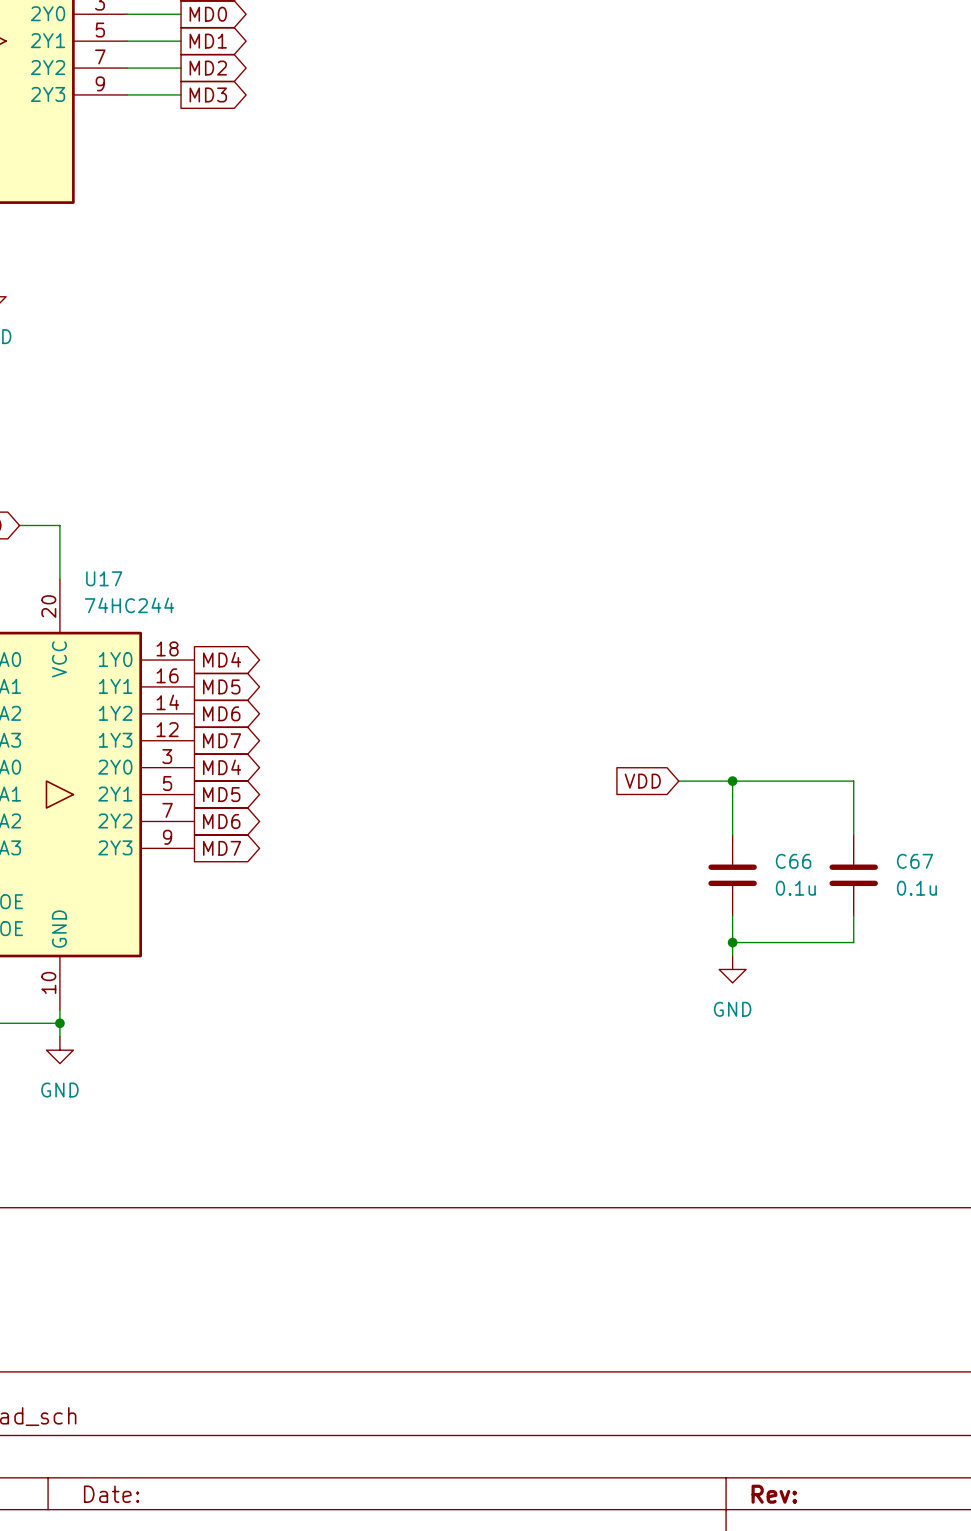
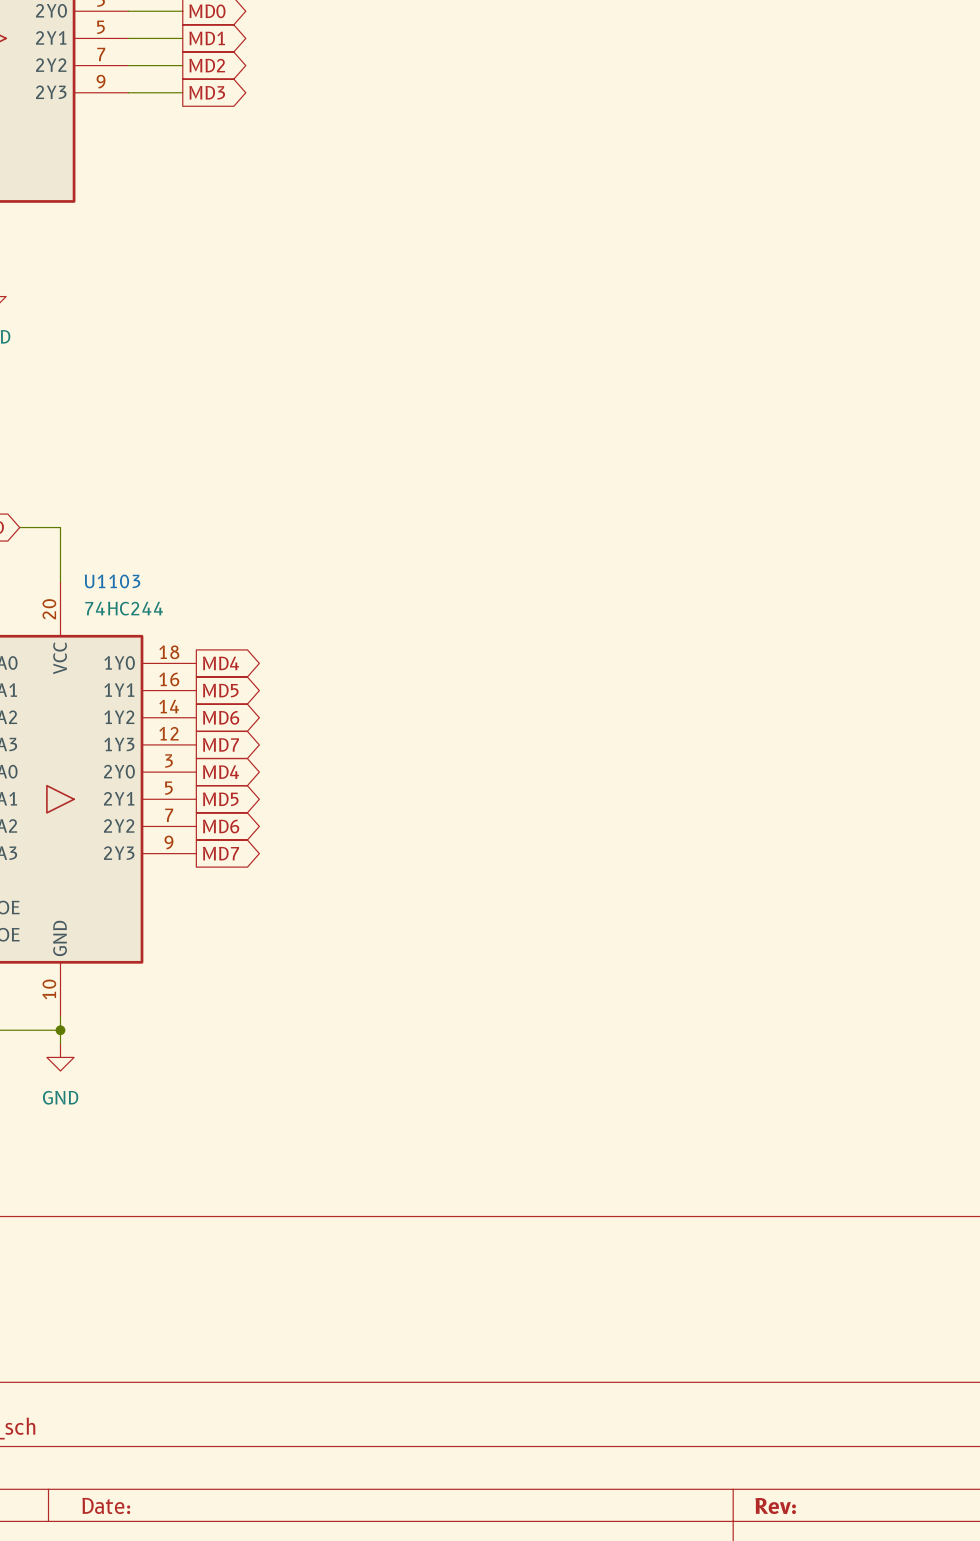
U17 name: U17 (104, 578) -> U1103 (112, 581)
global label: VDD (642, 781) -> none
wire: (678, 781) (853, 781) (853, 834) -> none
wire: (732, 781) (732, 834) -> none
junction: (732, 781) -> none
C66: 0.1u (732, 875) -> none
C67: 0.1u (853, 875) -> none
wire: (732, 915) (732, 956) -> none
wire: (853, 915) (853, 942) (732, 942) -> none
junction: (732, 942) -> none
power symbol: GND (732, 969) -> none

